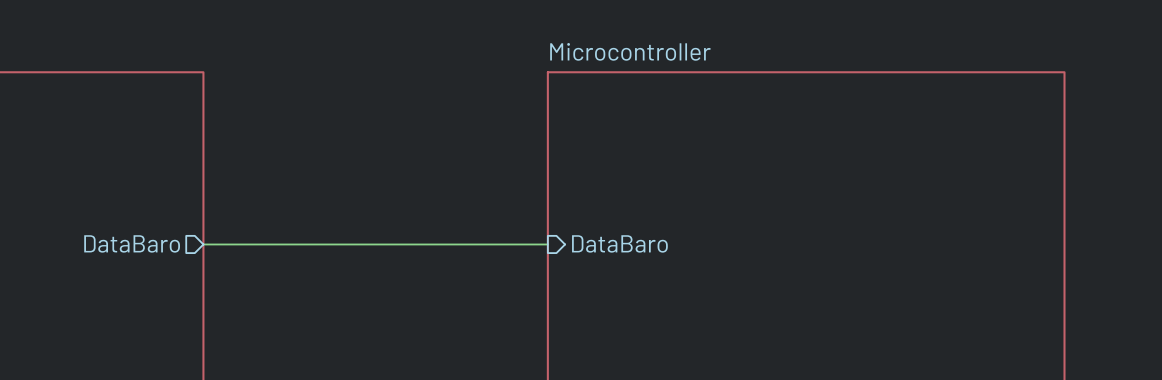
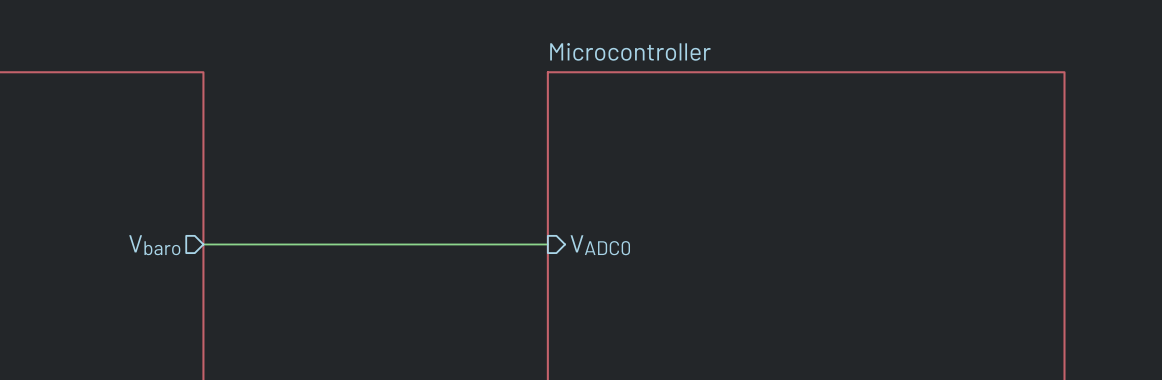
sheet pin: DataBaro (132, 243) -> Vbaro (154, 245)
sheet pin: DataBaro (619, 243) -> VADC0 (600, 245)

